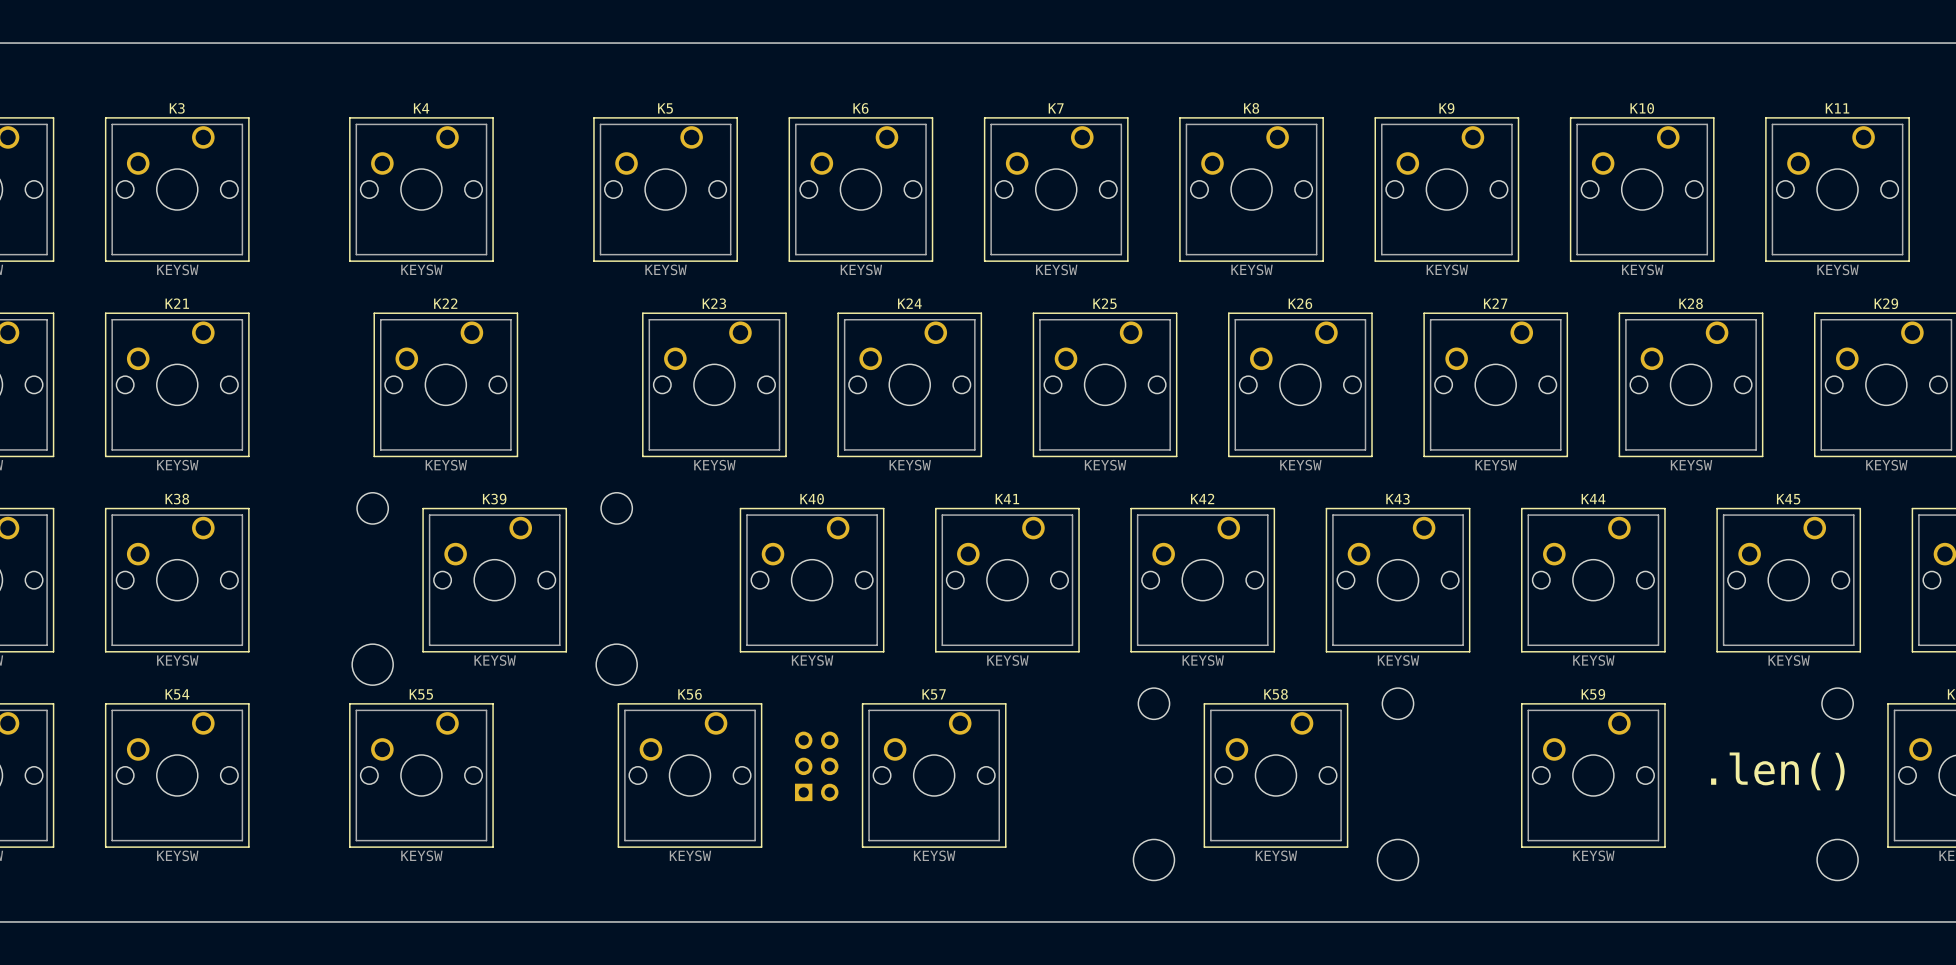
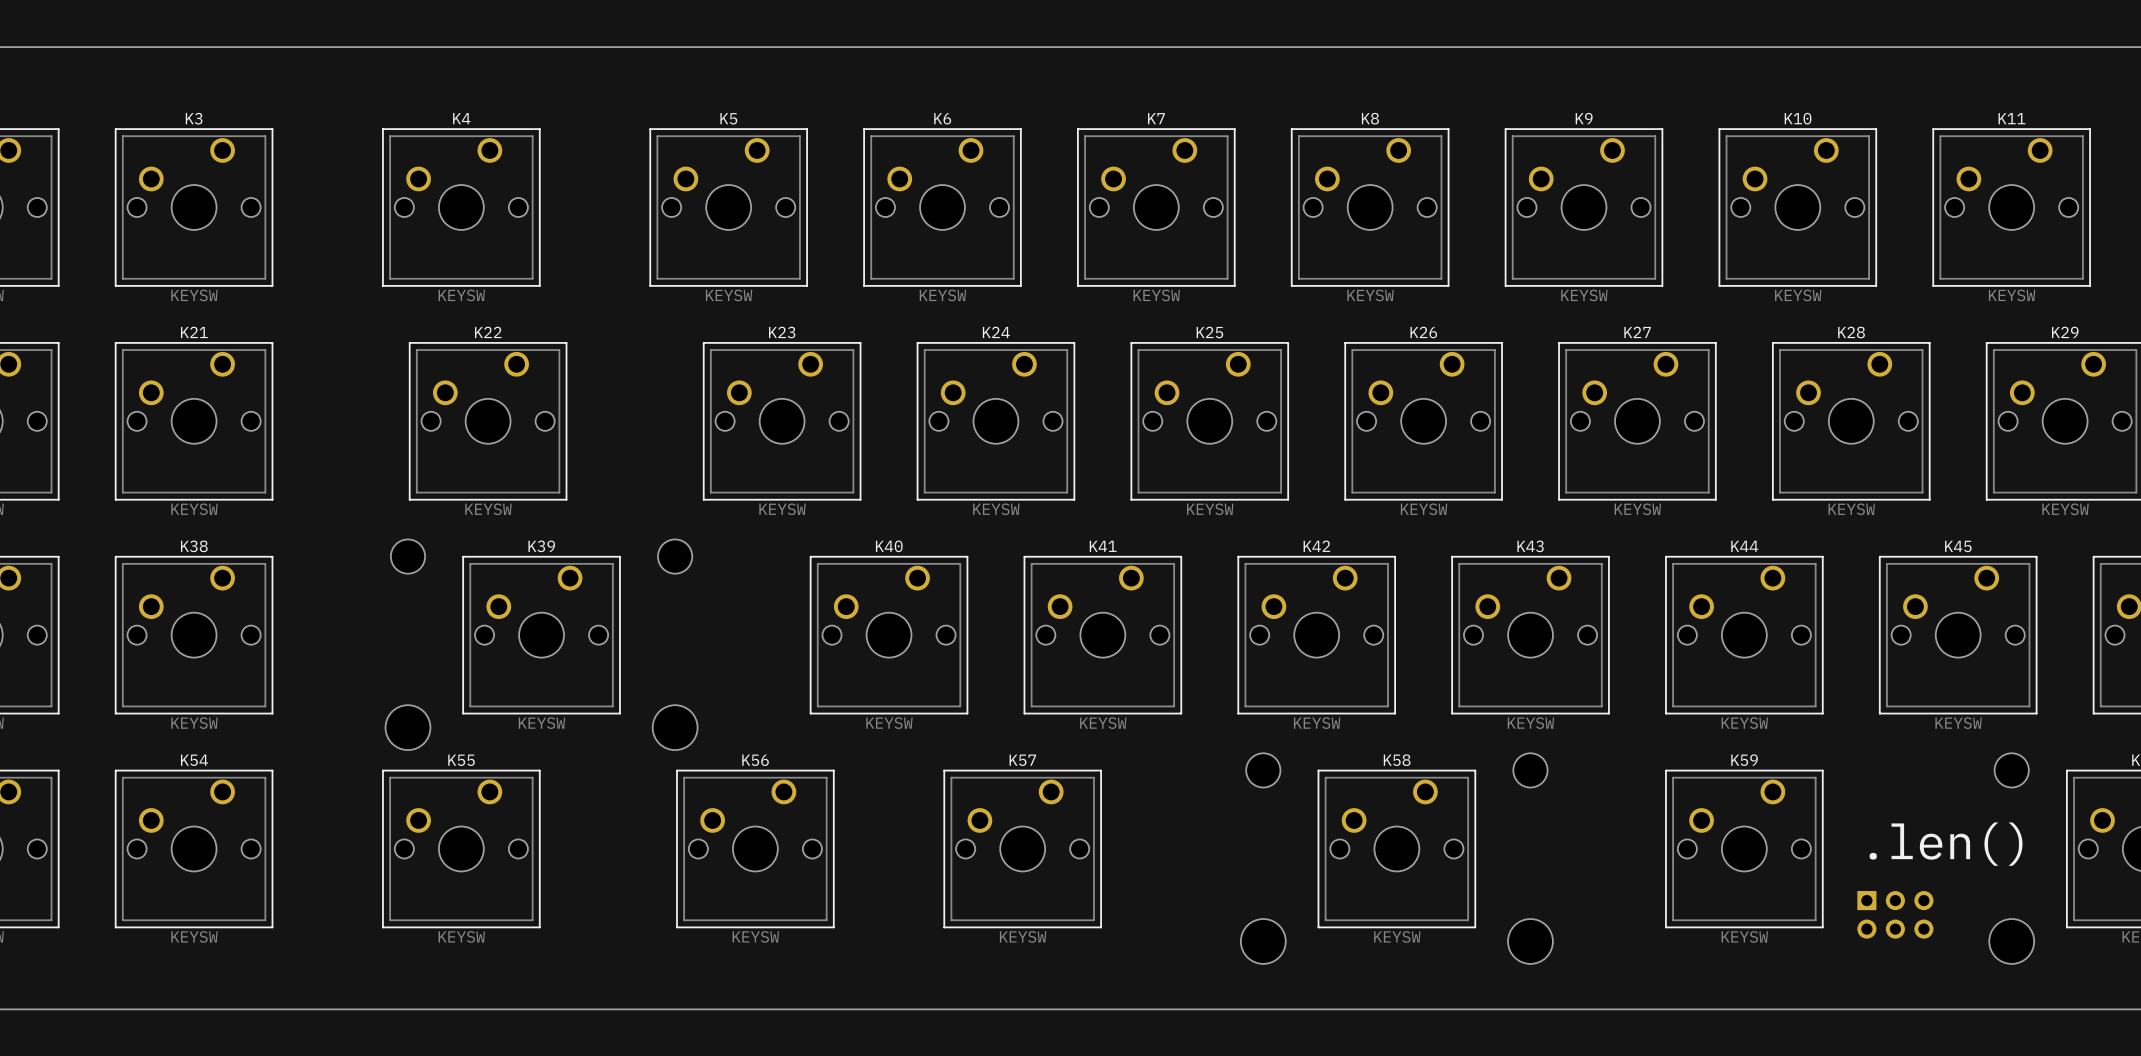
part: (816, 766) -> none
part: none -> (1895, 914)

